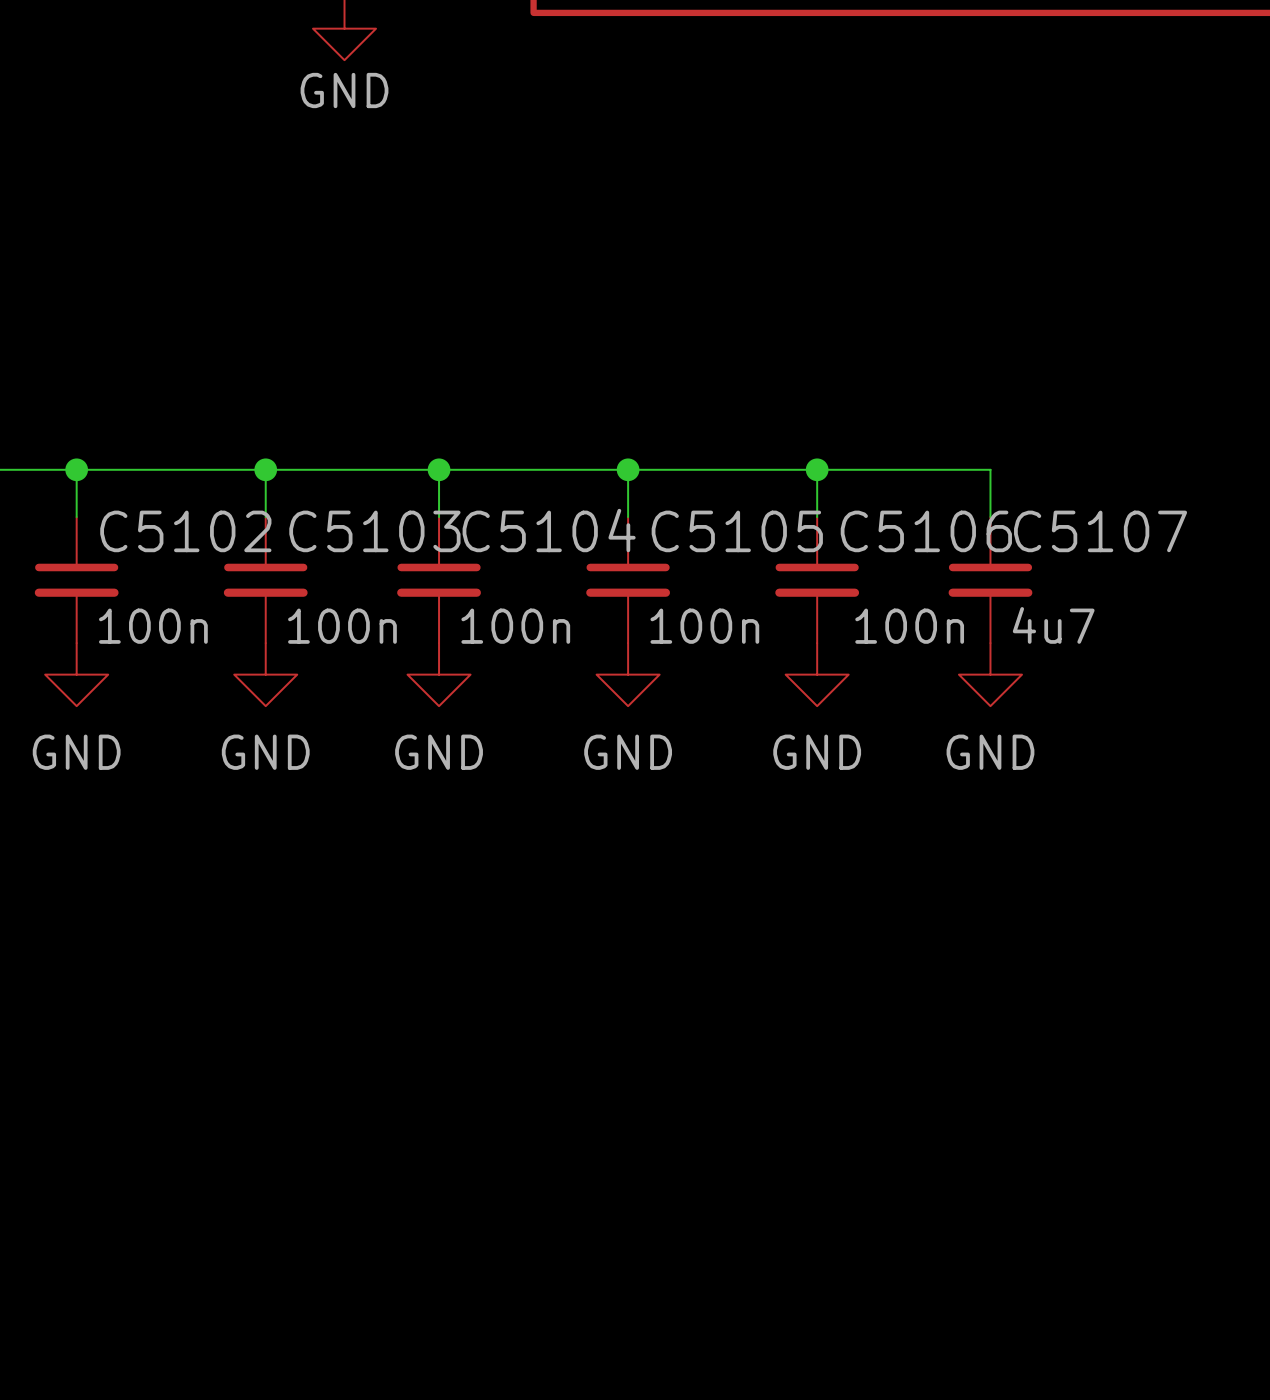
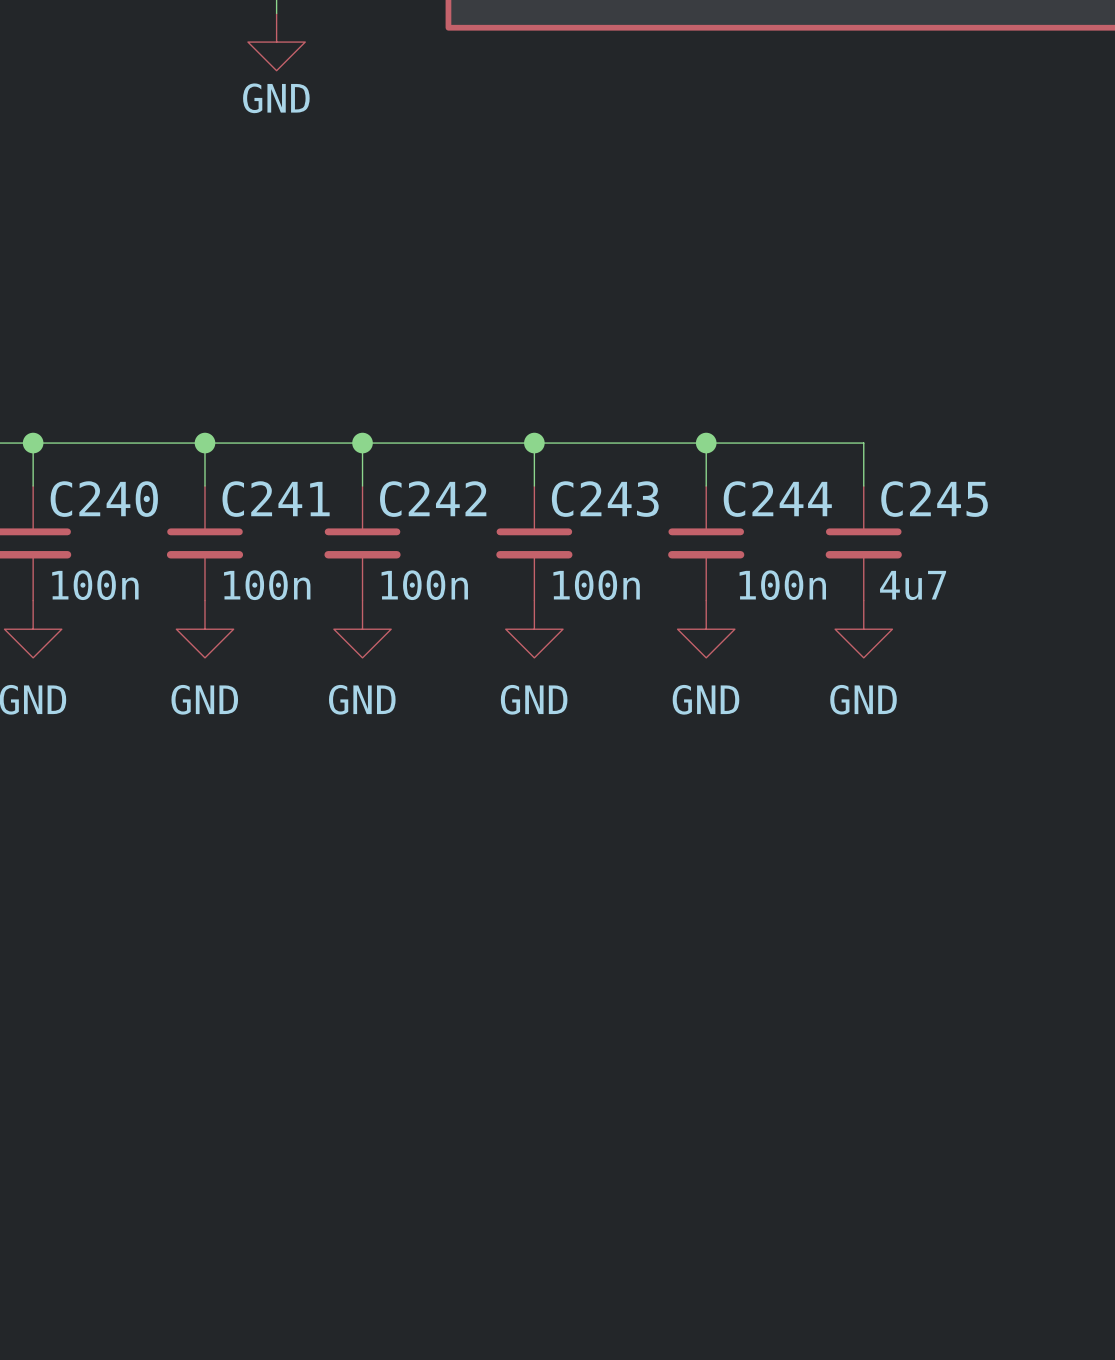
C5104 name: C5104 (549, 530) -> C242 (433, 499)
C5102 name: C5102 (185, 531) -> C240 (104, 499)
C5103 name: C5103 (374, 531) -> C241 (276, 499)
C5105 name: C5105 (737, 531) -> C243 (605, 499)
C5106 name: C5106 (926, 531) -> C244 (777, 499)
C5107 name: C5107 (1100, 531) -> C245 (934, 499)

